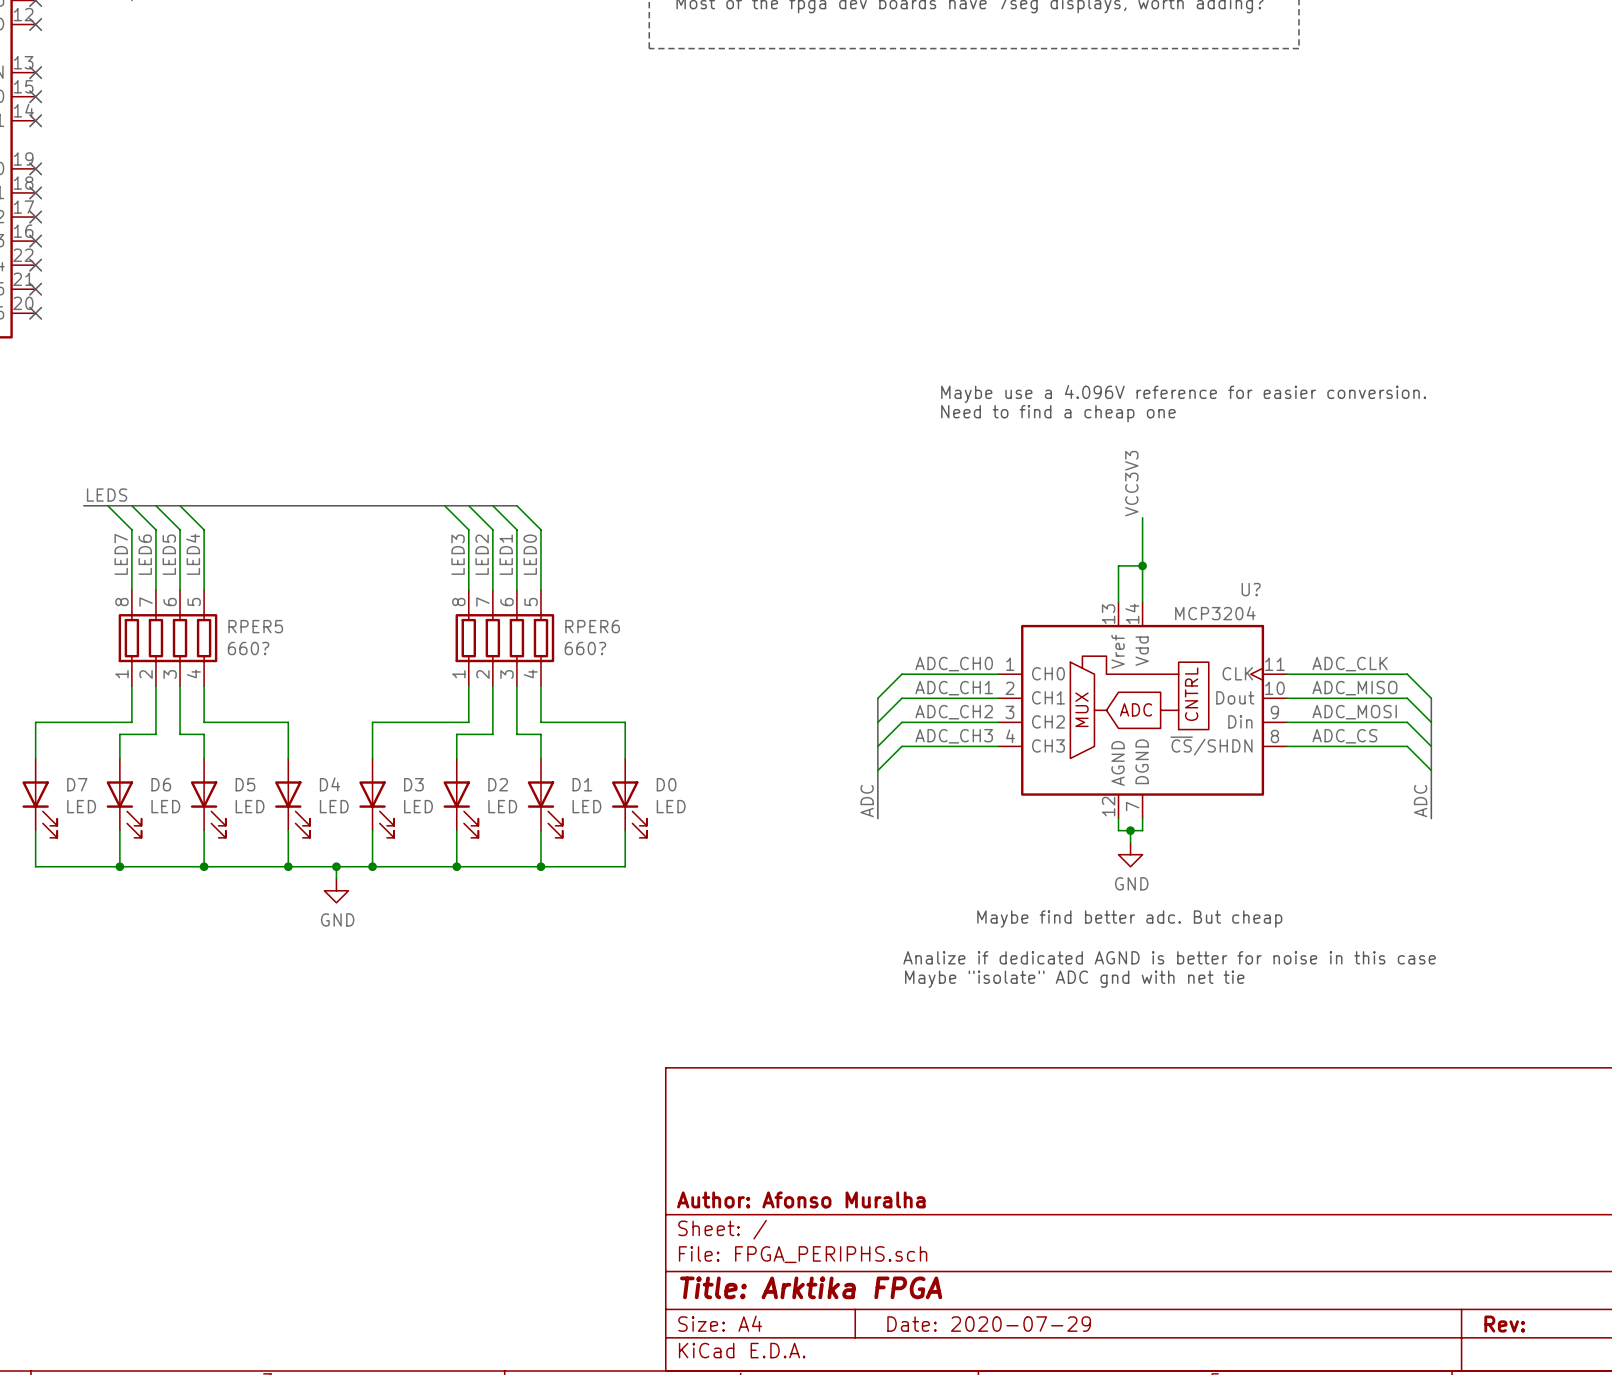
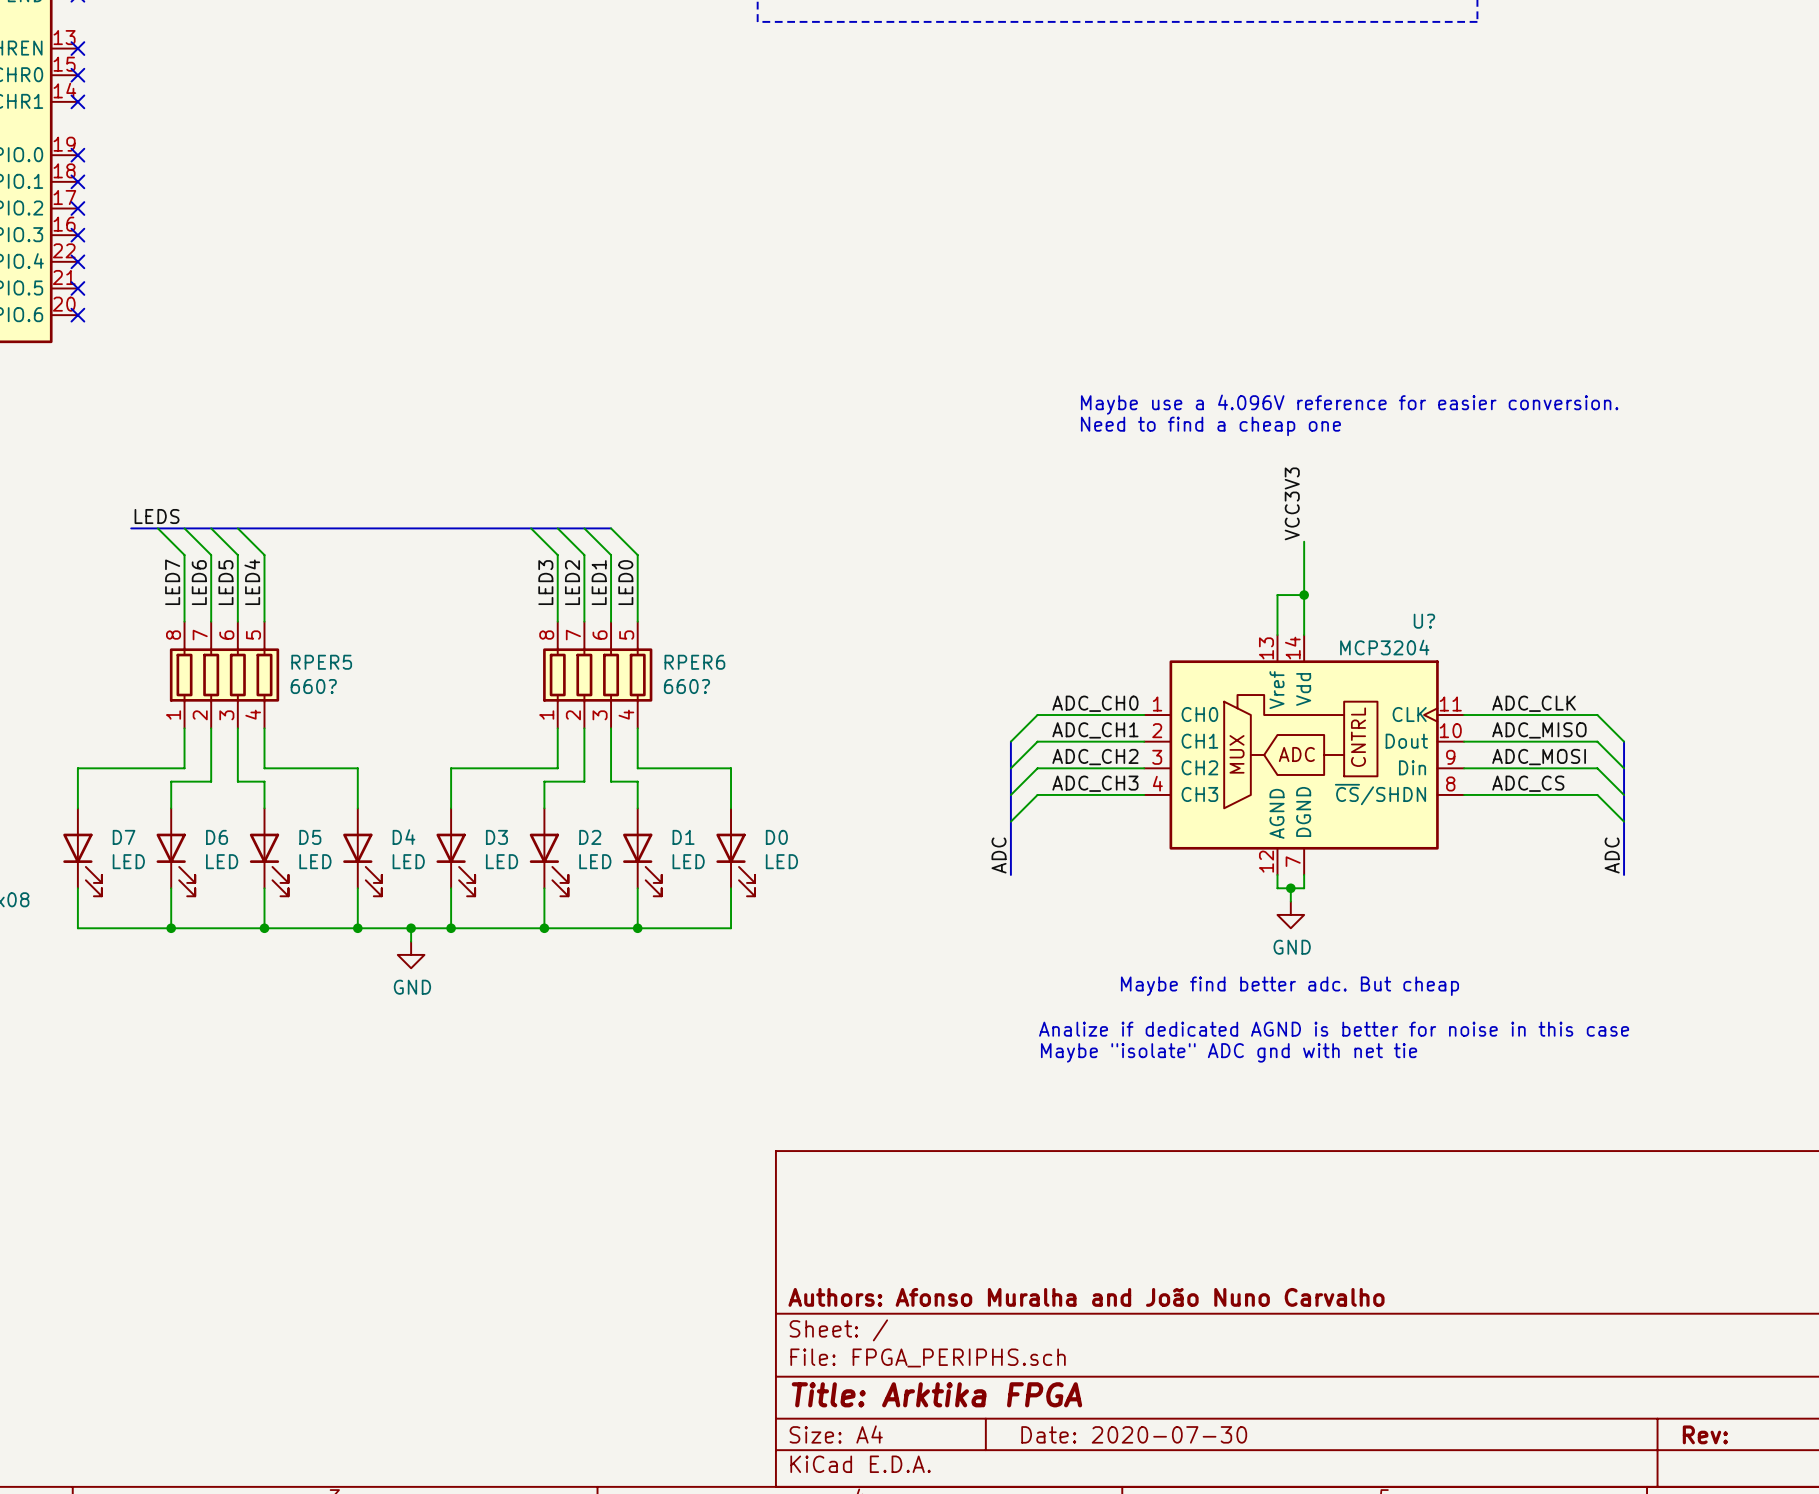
title block: Author: Afonso Muralha (801, 1199) -> Authors: Afonso Muralha and João Nuno Carvalho (1086, 1297)
title block: Date: 2020-07-29 (989, 1324) -> Date: 2020-07-30 (1134, 1434)

